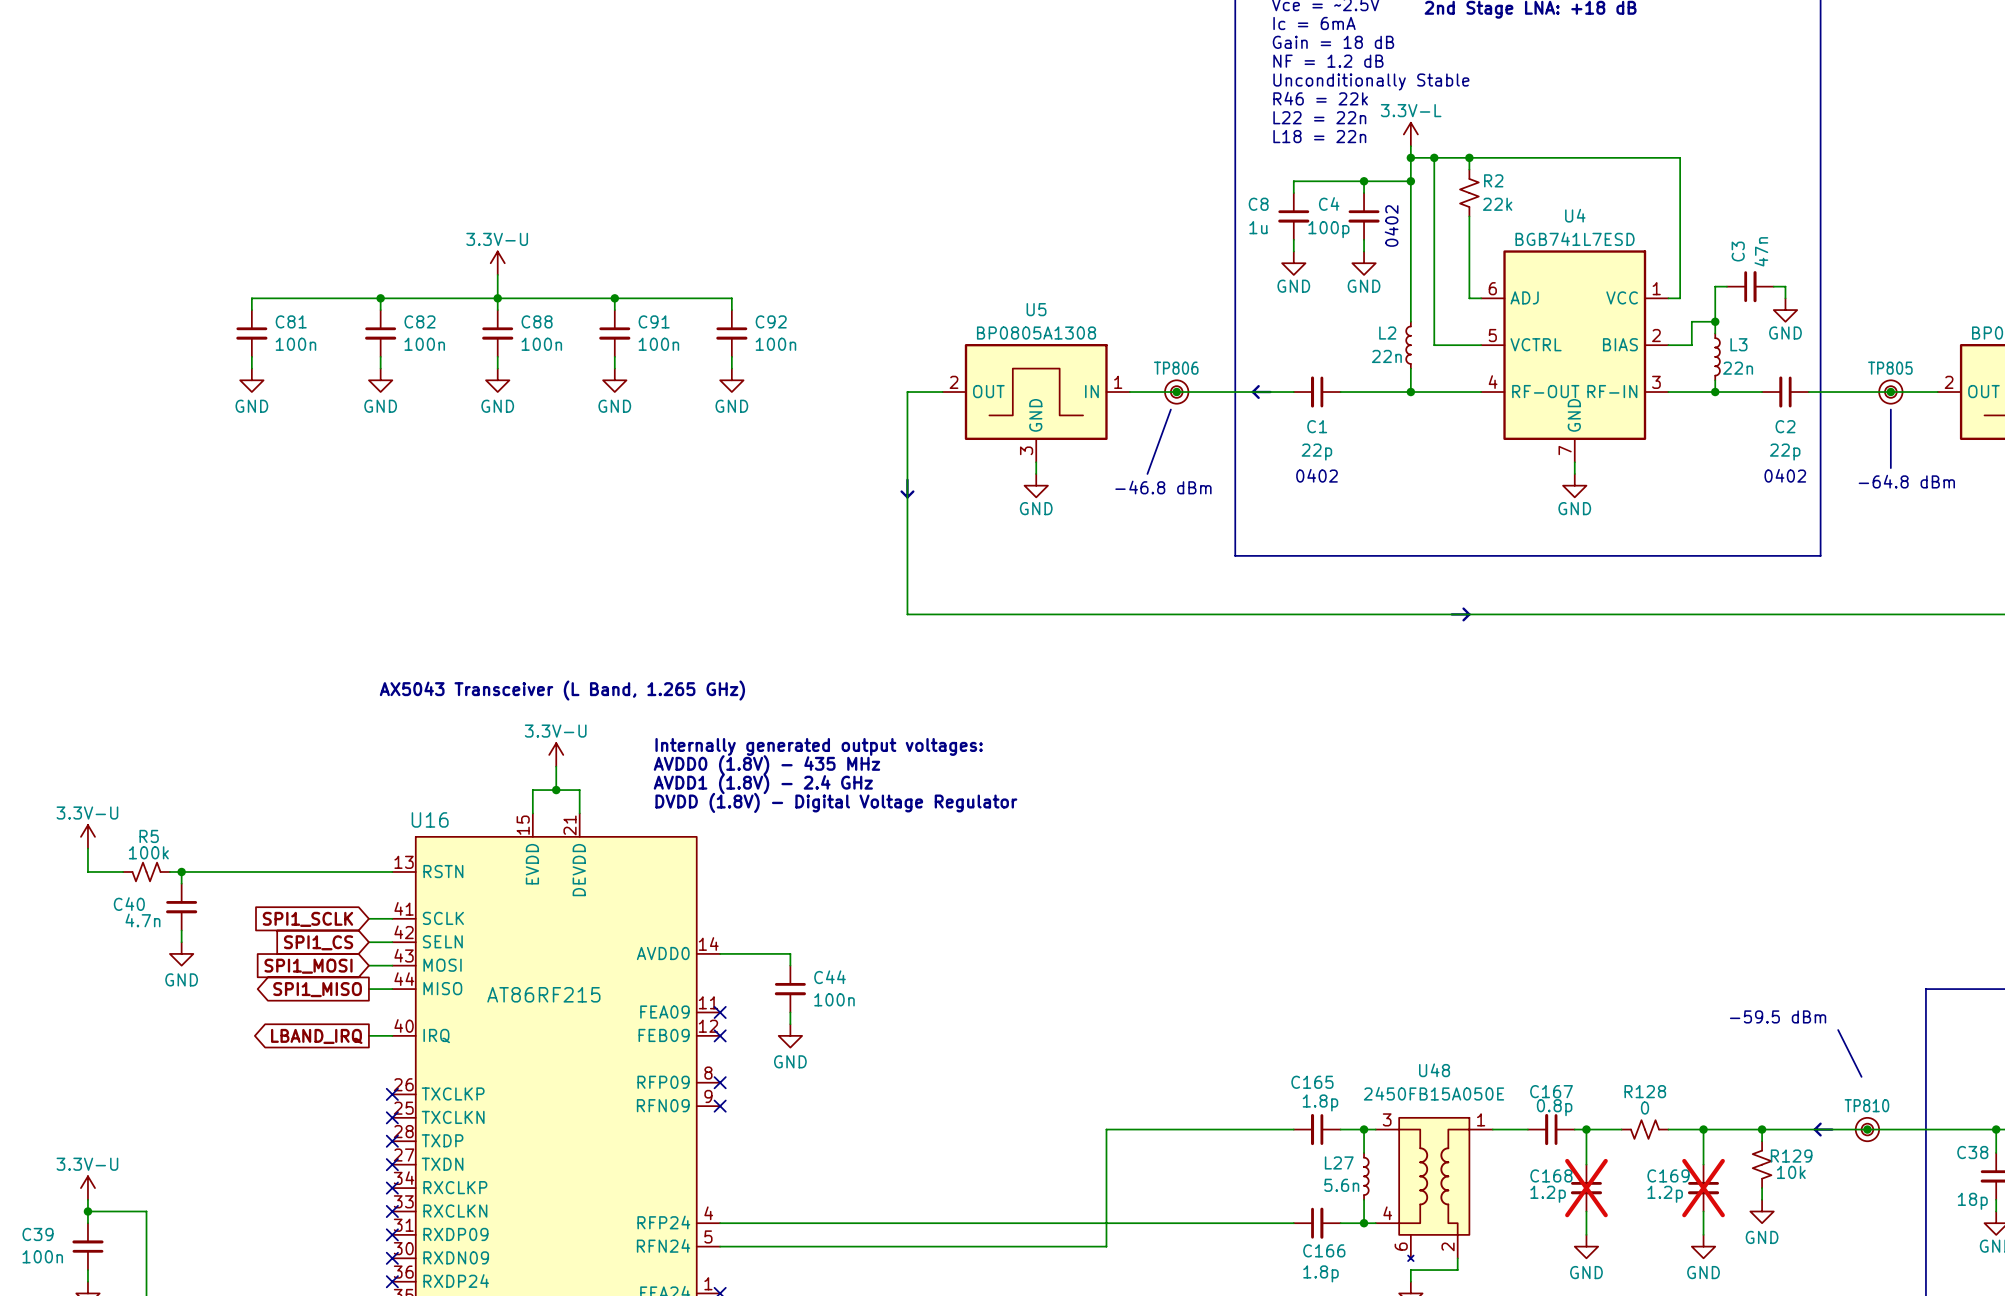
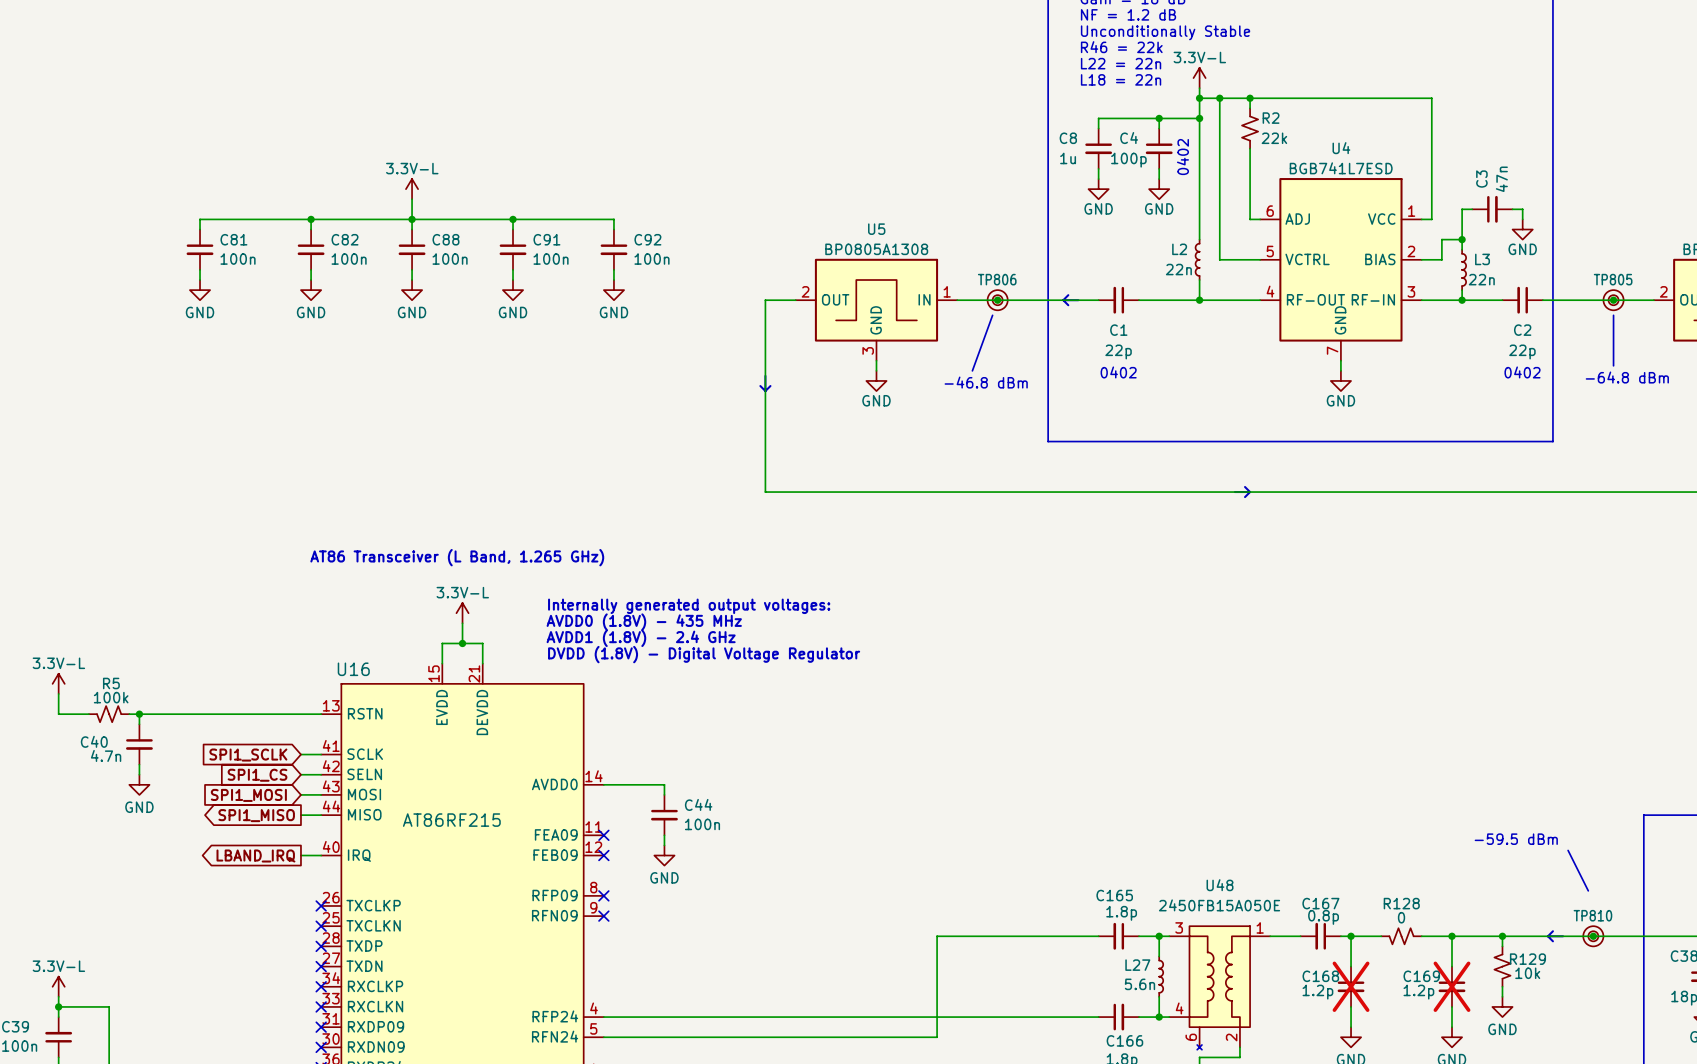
power symbol: 3.3V-U (497, 263) -> 3.3V-L (412, 189)
text: AX5043 Transceiver (L Band, 1.265 GHz) (562, 690) -> AT86 Transceiver (L Band, 1.265 GHz) (457, 557)
power symbol: 3.3V-U (556, 754) -> 3.3V-L (462, 613)
power symbol: 3.3V-U (87, 836) -> 3.3V-L (58, 683)
power symbol: 3.3V-U (87, 1188) -> 3.3V-L (58, 986)

